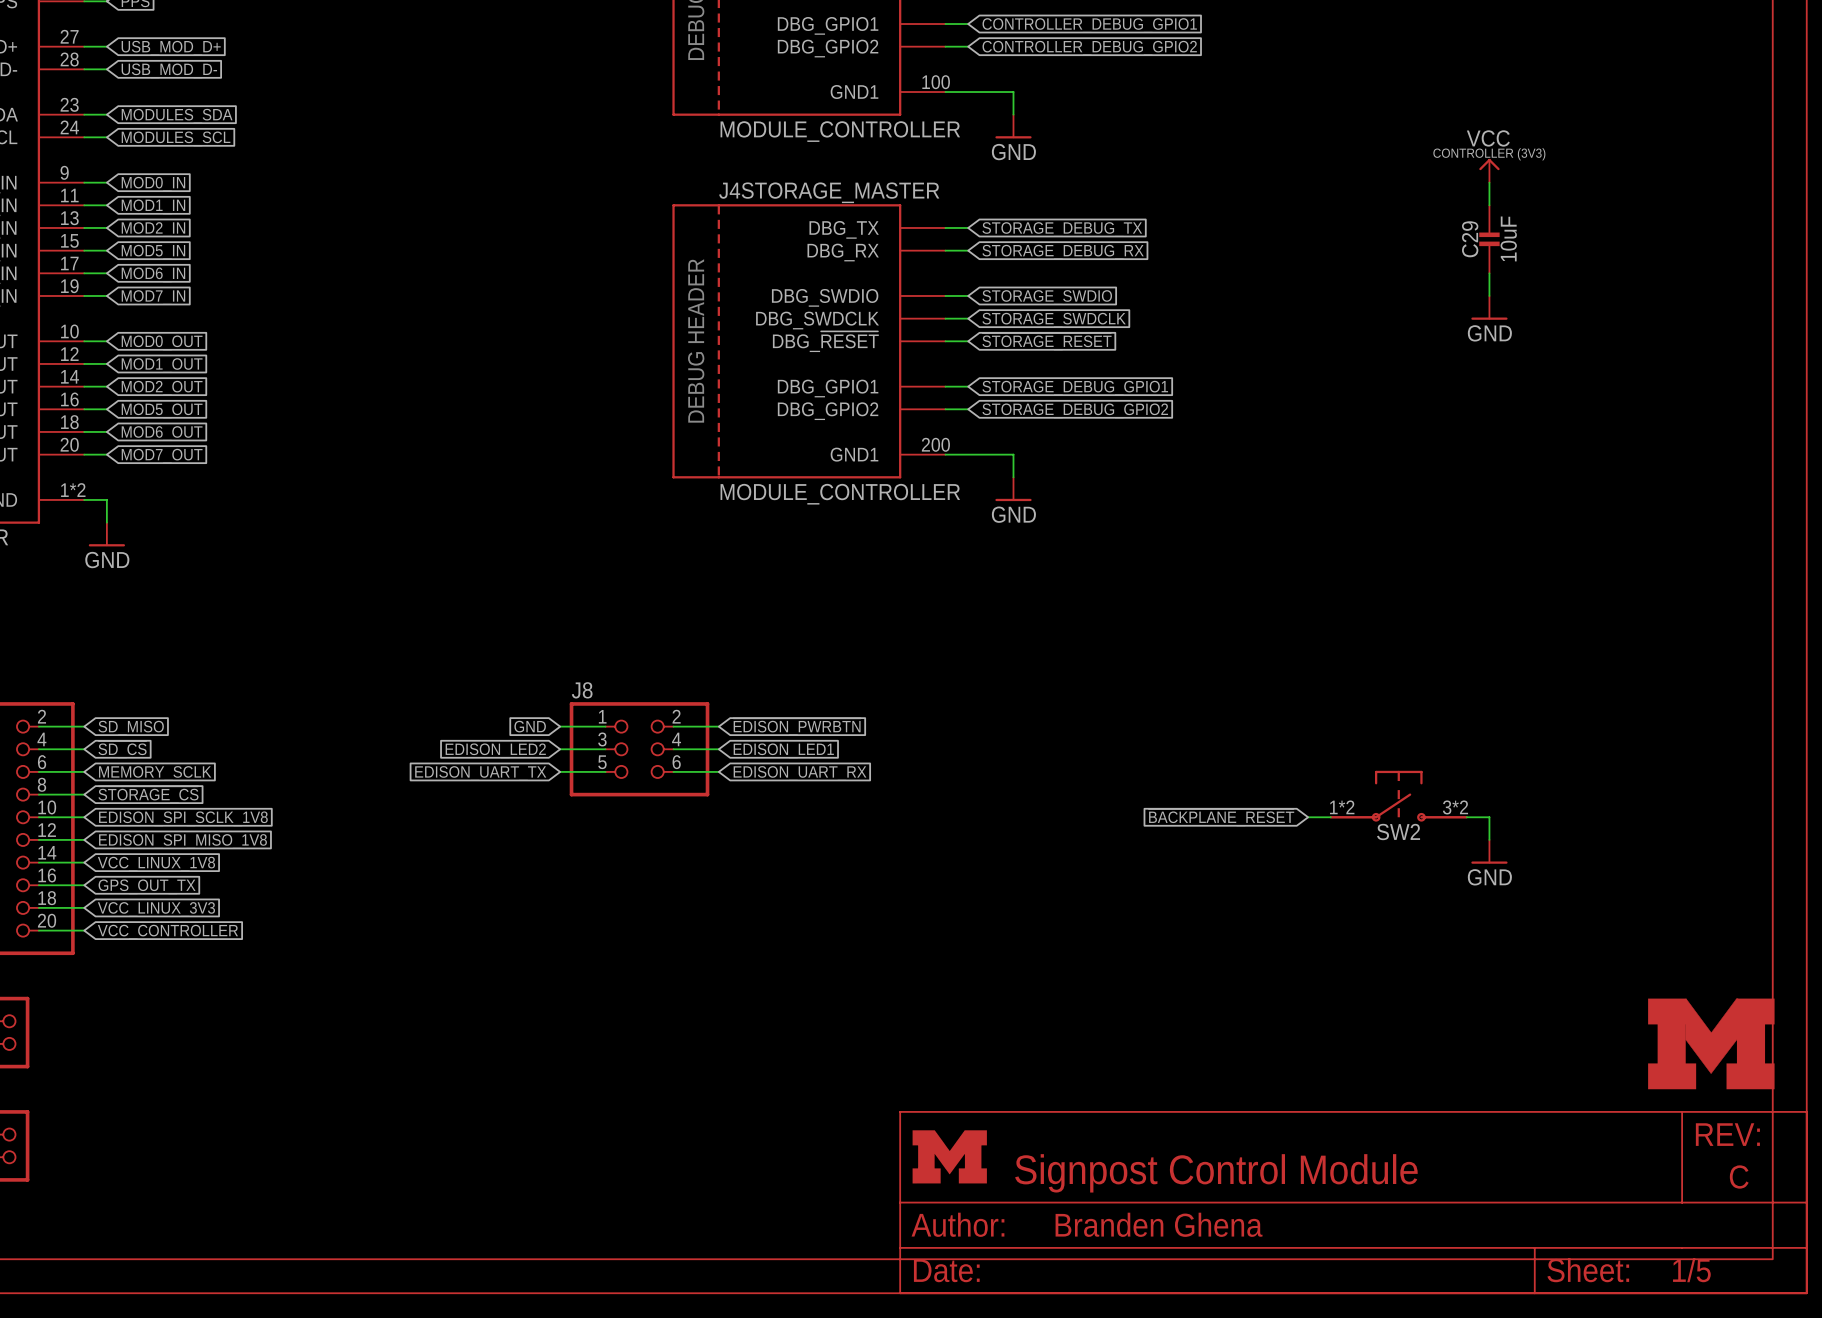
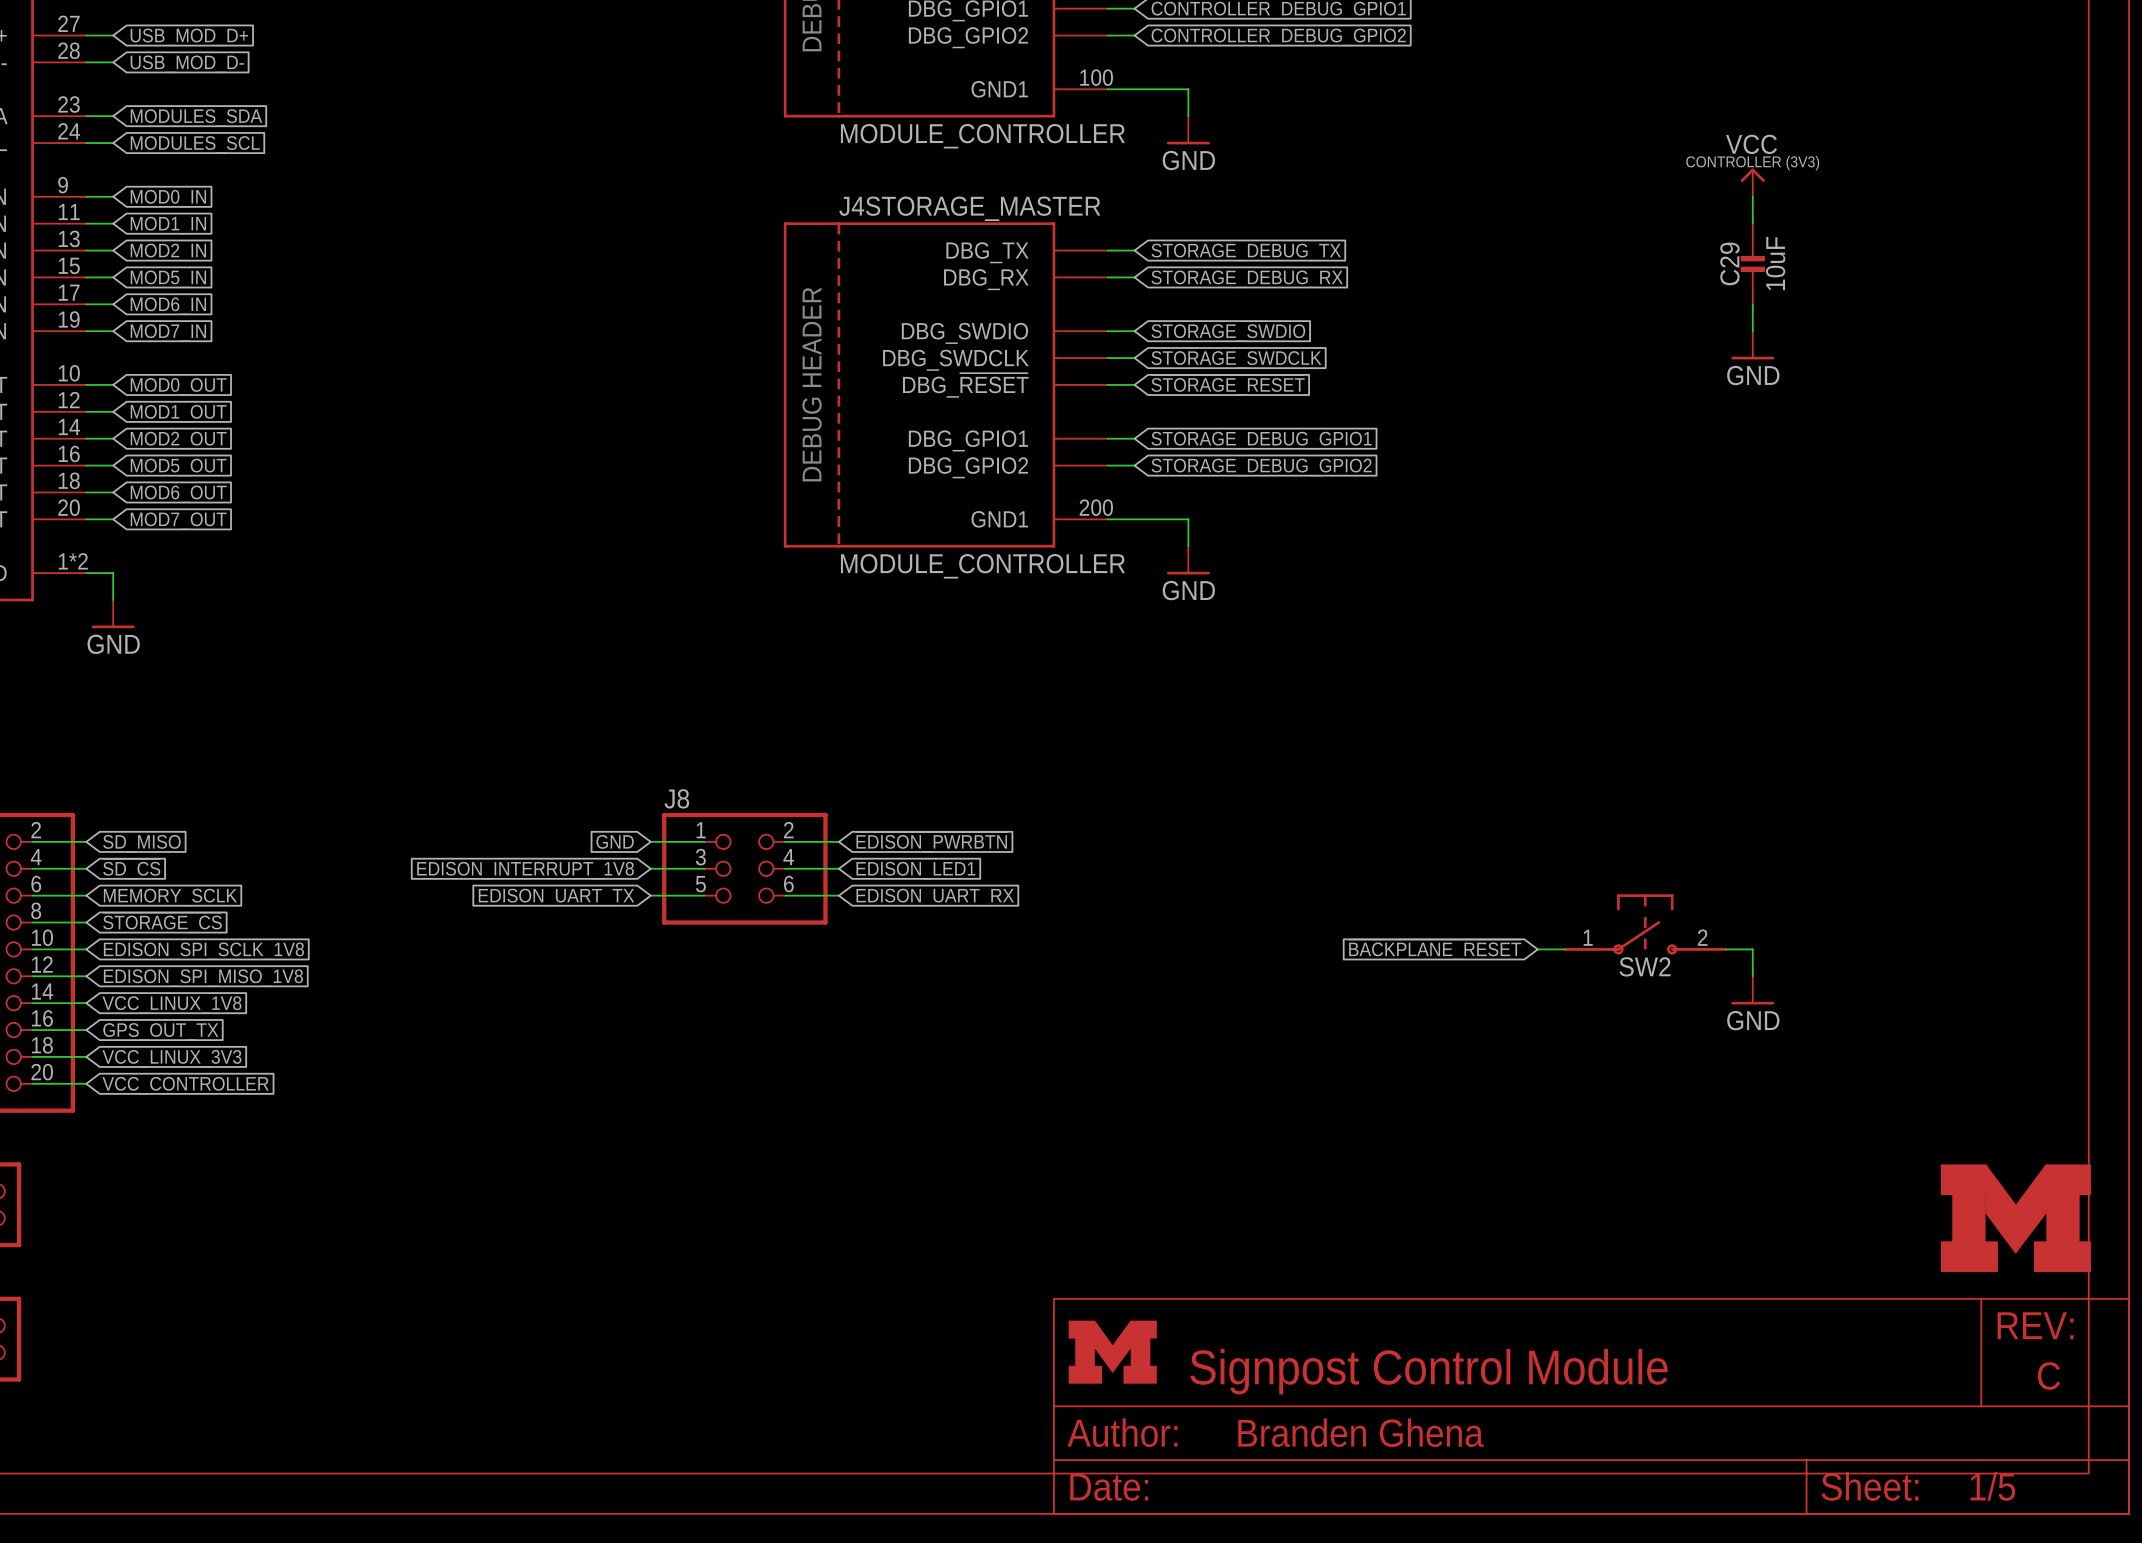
global label: EDISON_LED2 (495, 750) -> EDISON_INTERRUPT_1V8 (525, 870)
SW2 pin number: 1*2 (1342, 807) -> 1 (1588, 937)
SW2 pin number: 3*2 (1455, 807) -> 2 (1702, 937)

